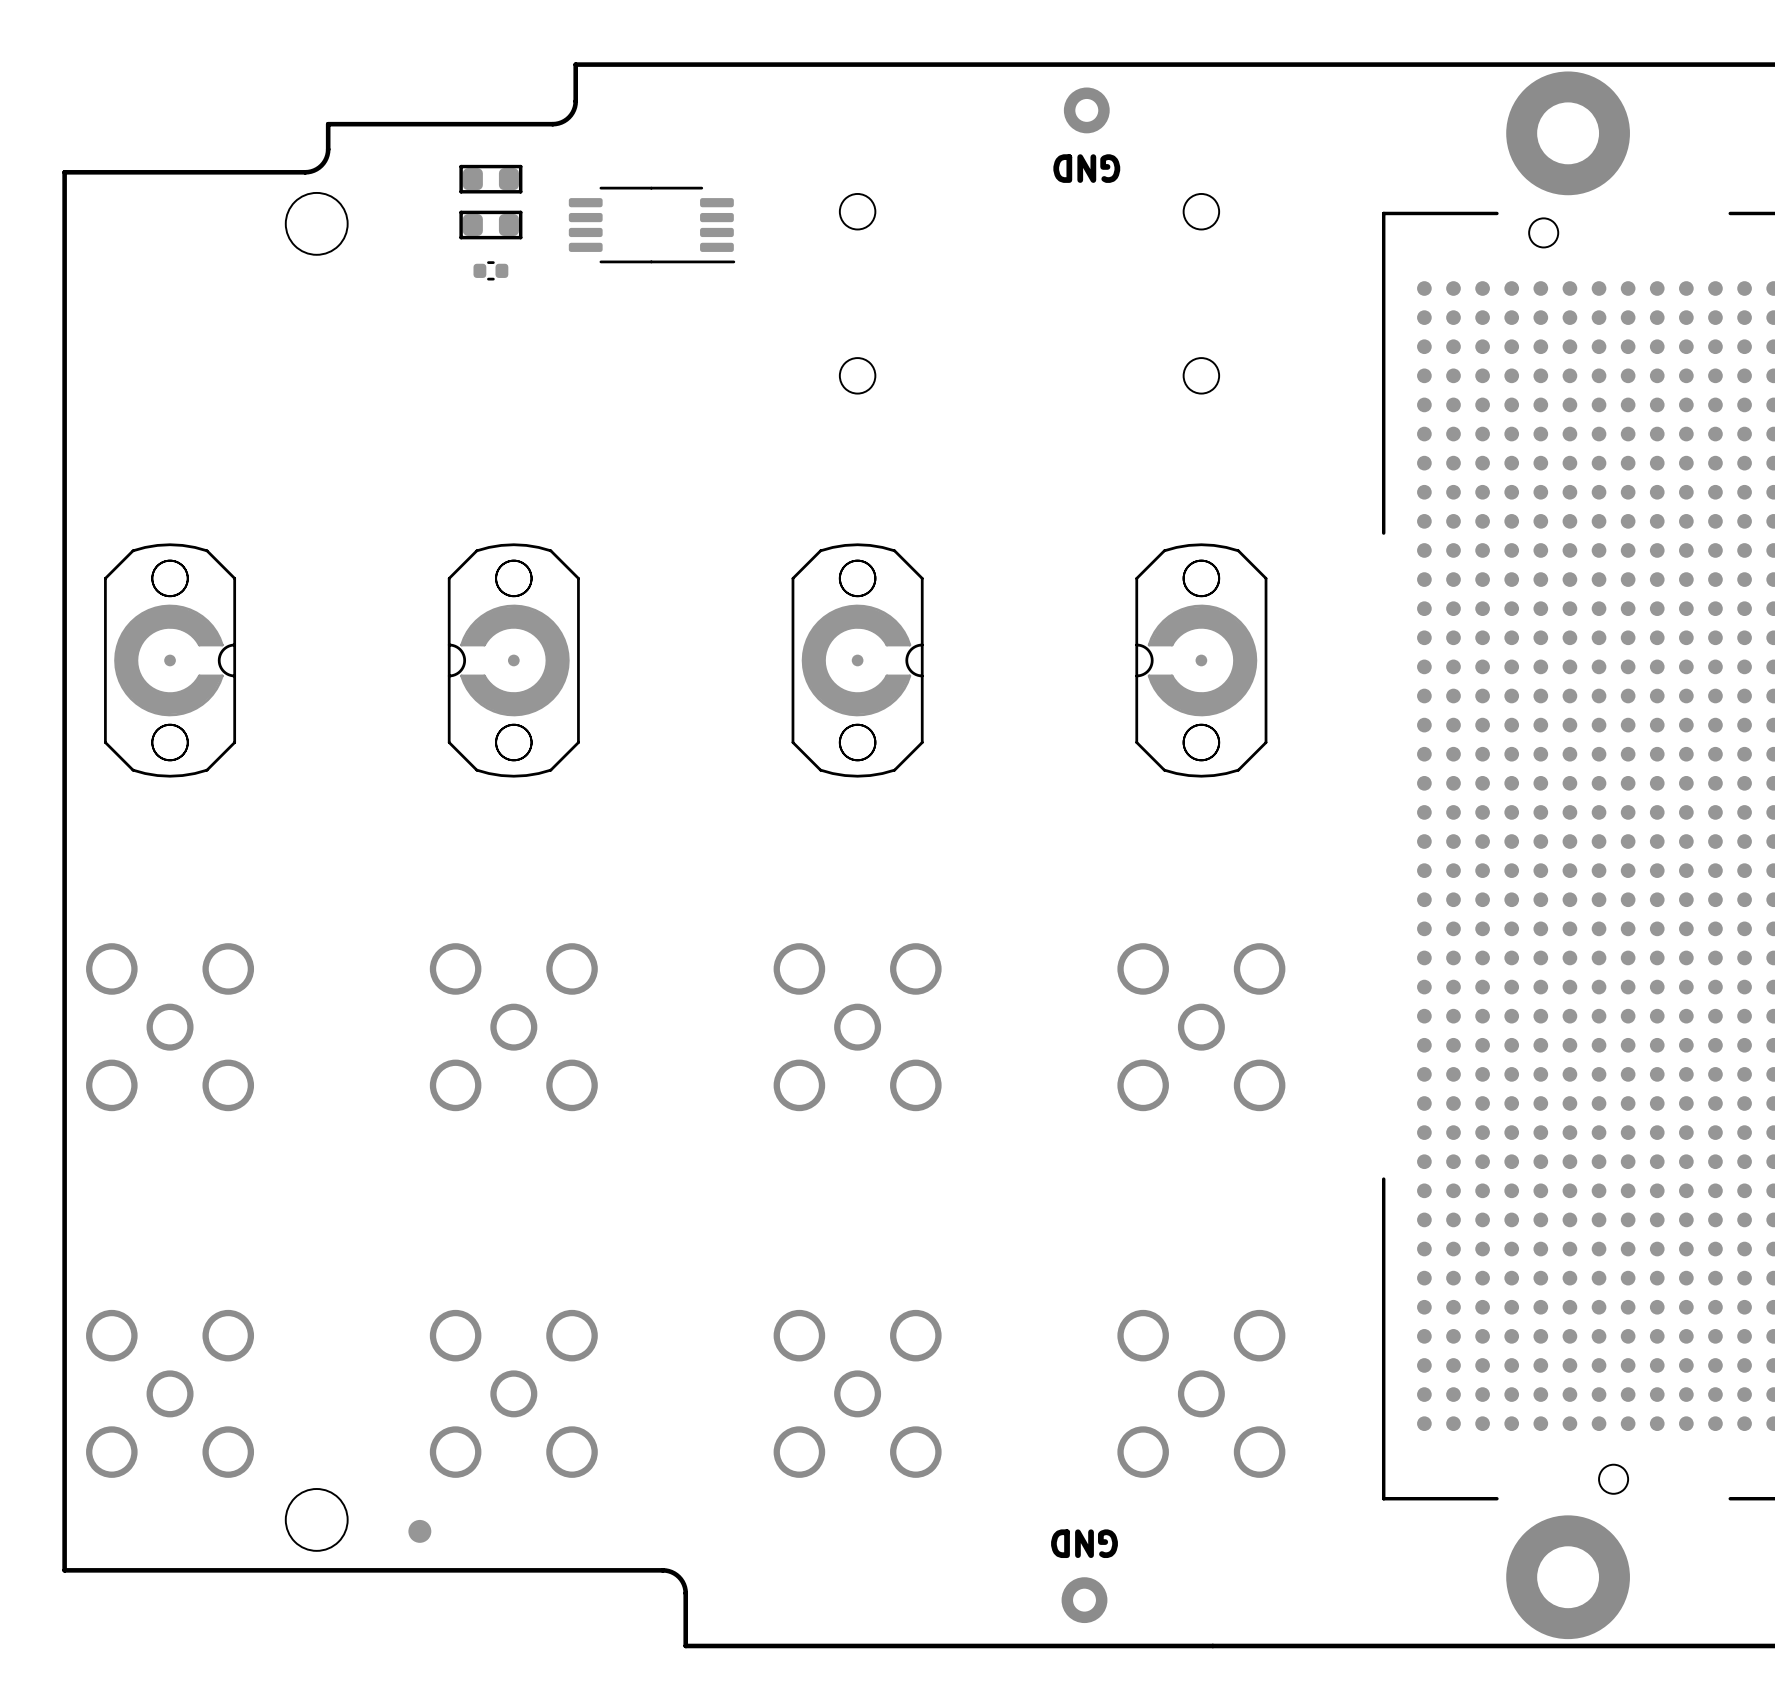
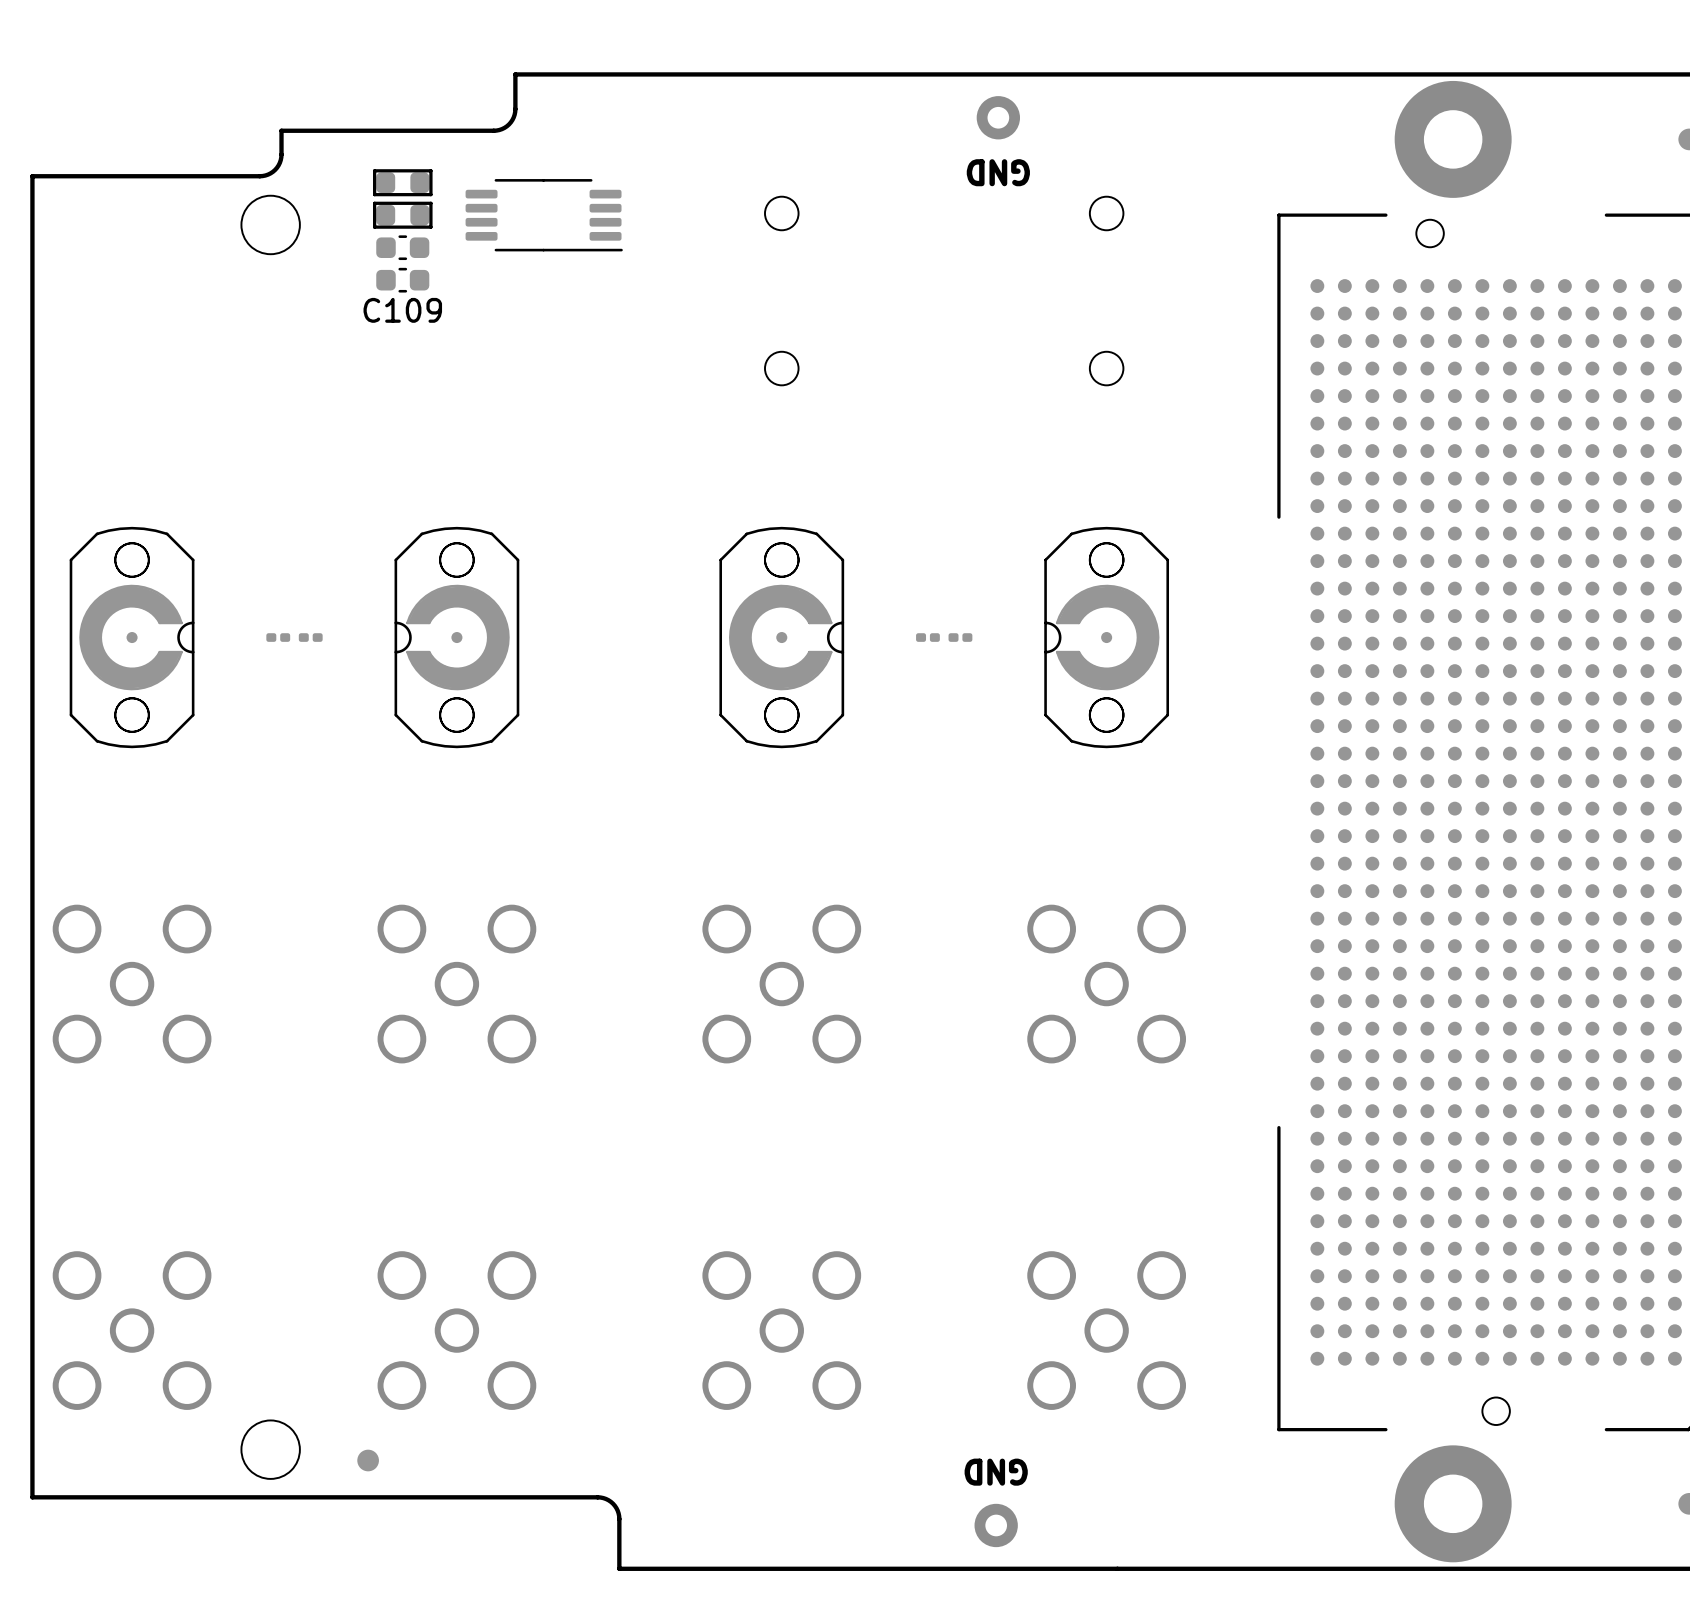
part: none -> (402, 182)
part: (490, 179) -> none
part: none -> (402, 215)
part: (490, 225) -> none
part position: (652, 225) -> (544, 215)
part: none -> (402, 247)
part: (490, 270) -> none
C109: none -> (402, 280)
part: none -> (278, 637)
part: none -> (310, 637)
part: none -> (927, 637)
part: none -> (960, 637)

